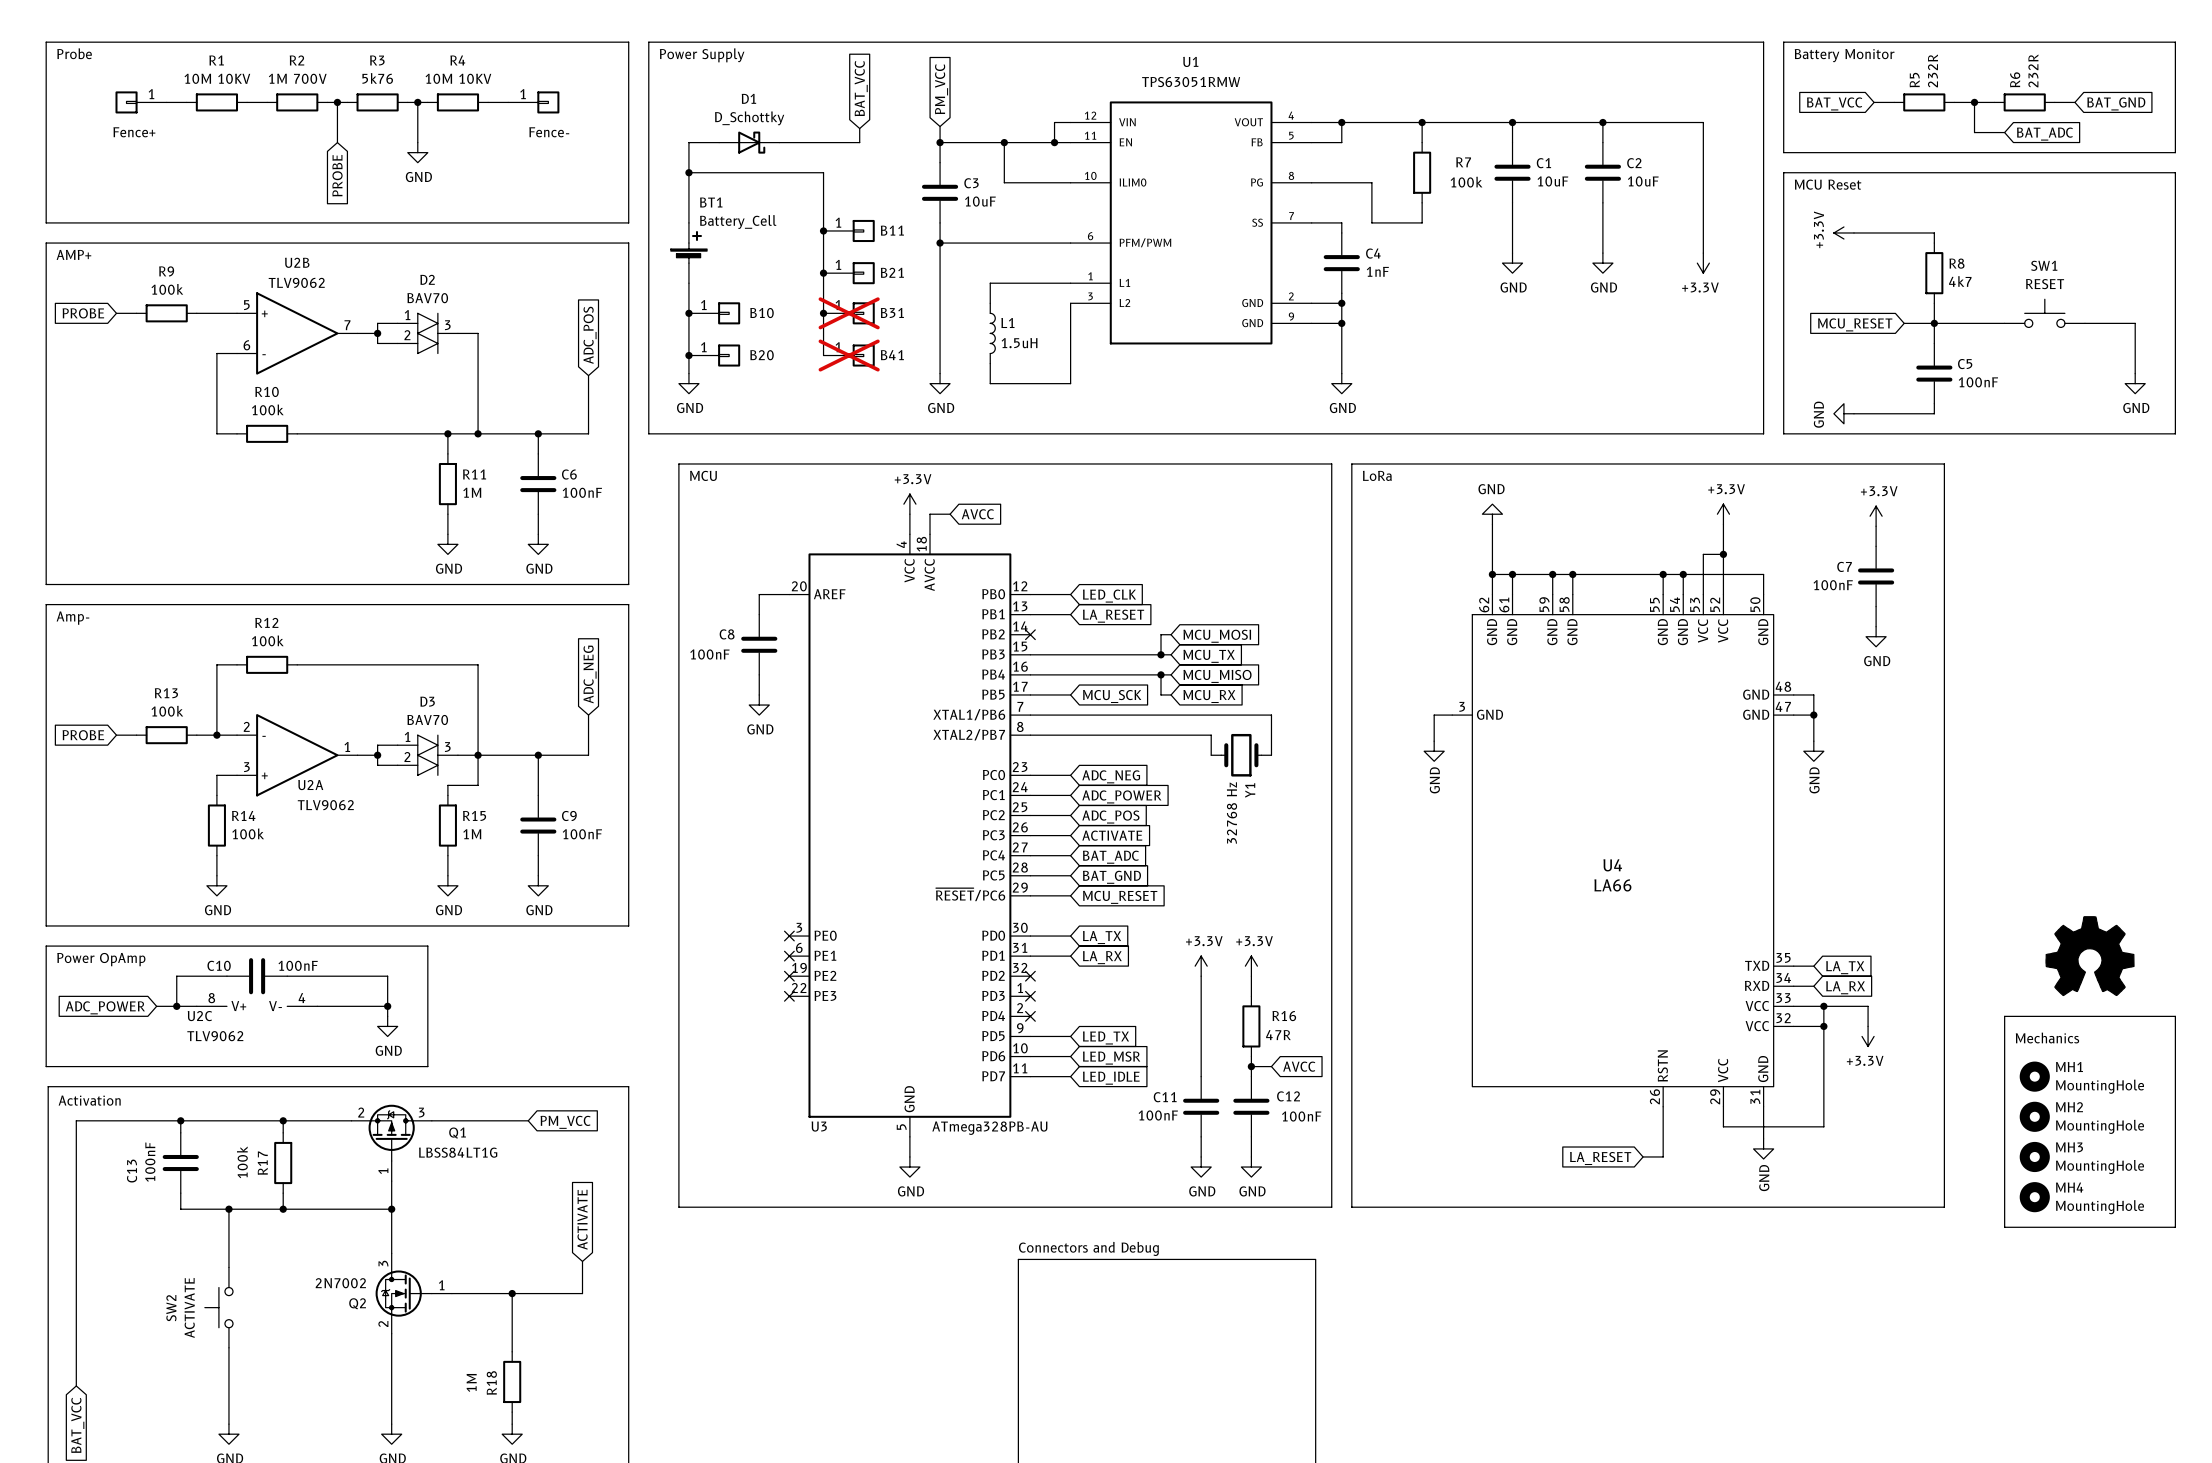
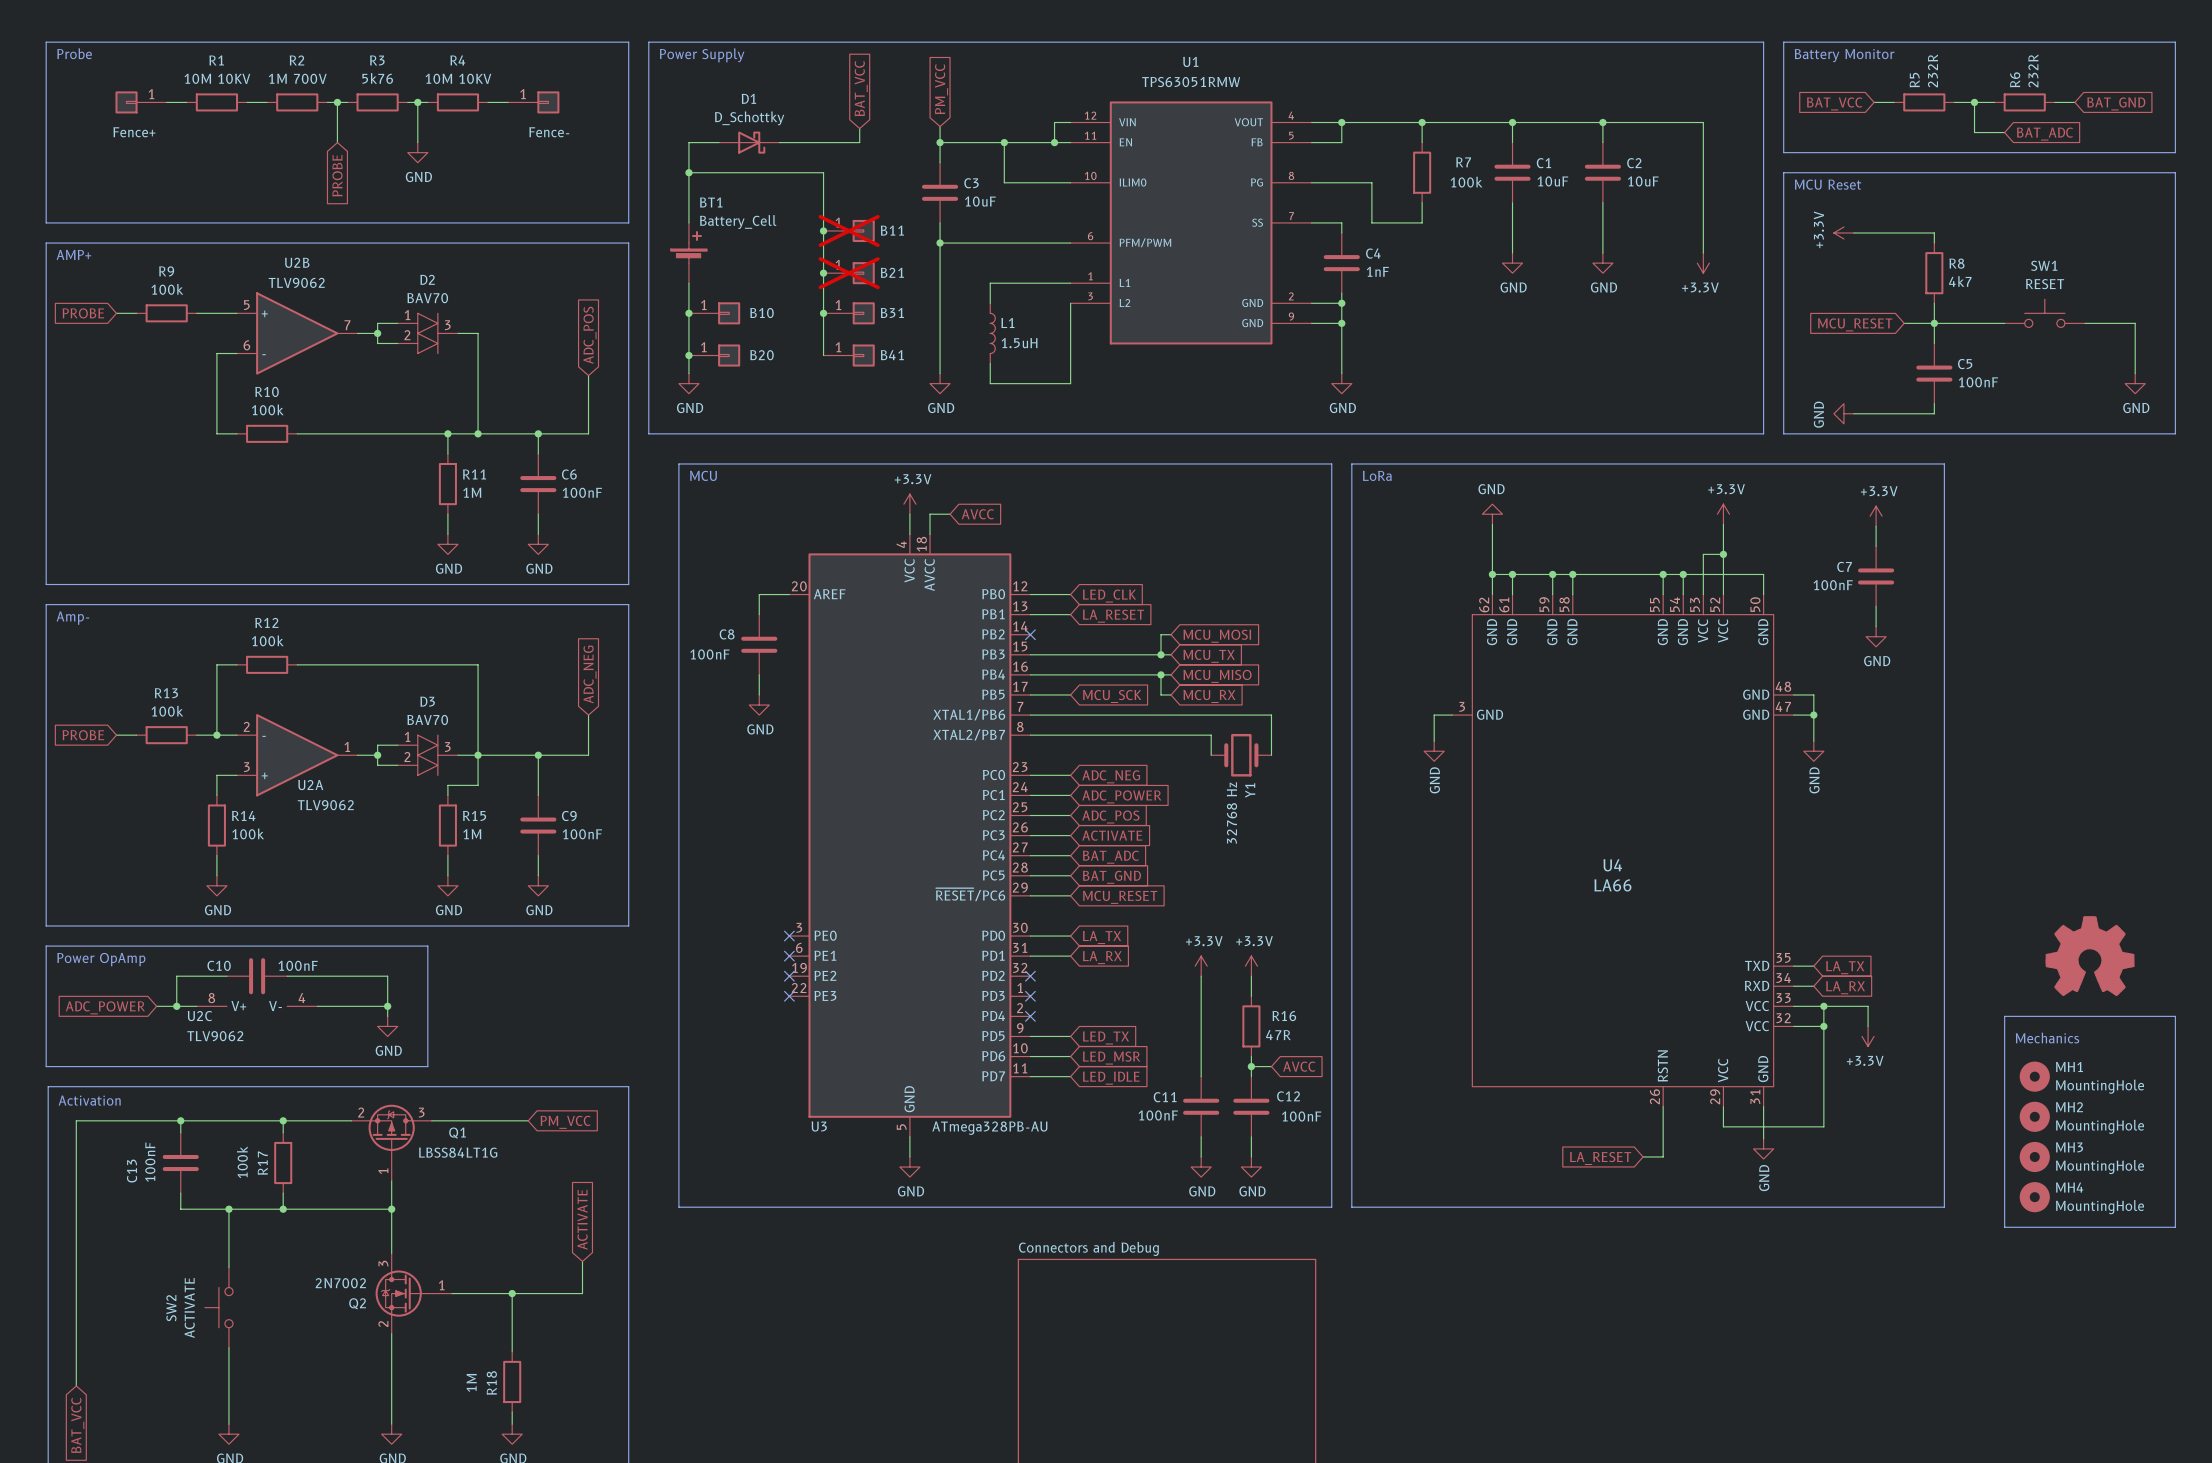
B11 do-not-place cross: none -> (849, 230)
B21 do-not-place cross: none -> (849, 273)
B31 do-not-place cross: (849, 313) -> none
B41 do-not-place cross: (849, 355) -> none

